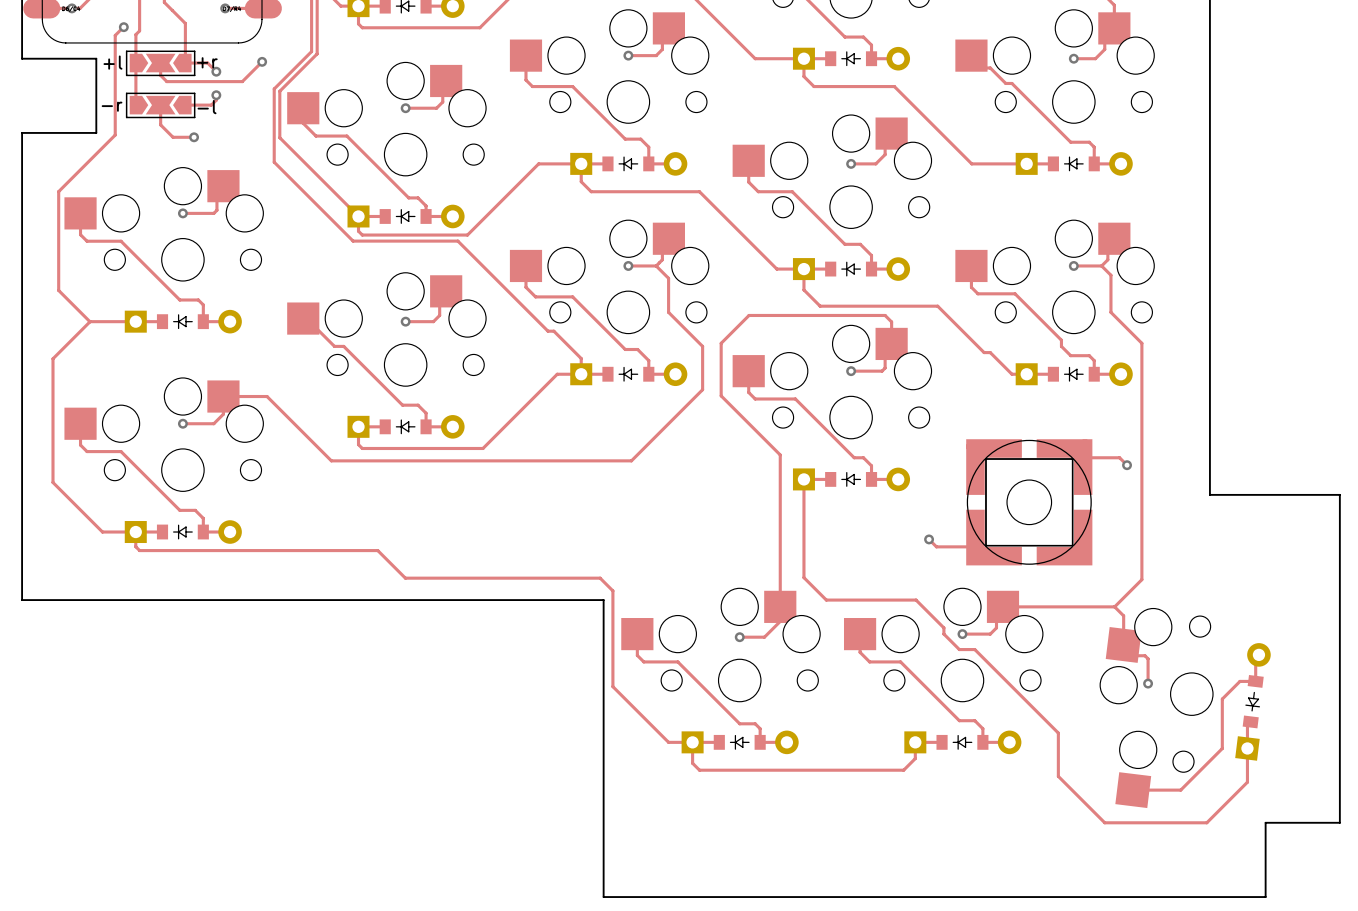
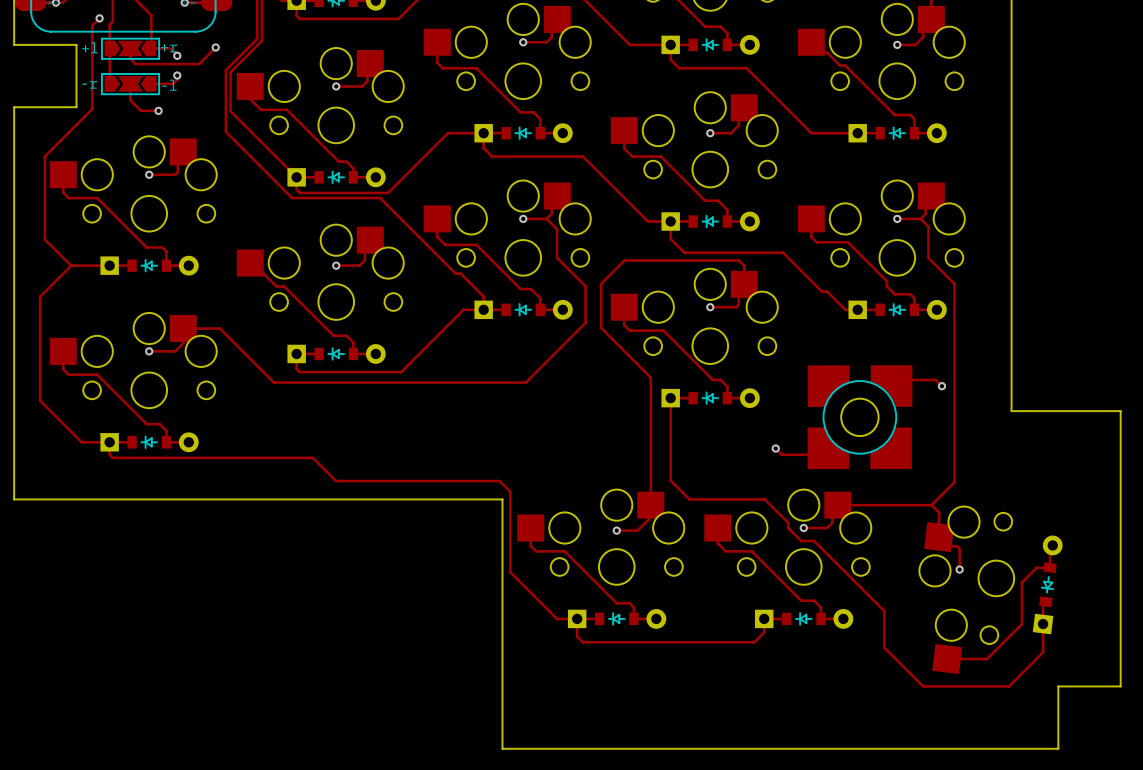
part footprint: [966, 439, 1093, 566] -> [807, 365, 913, 470]
line: (985, 459) (1072, 459) (1072, 545) (985, 545) (985, 459) -> none

